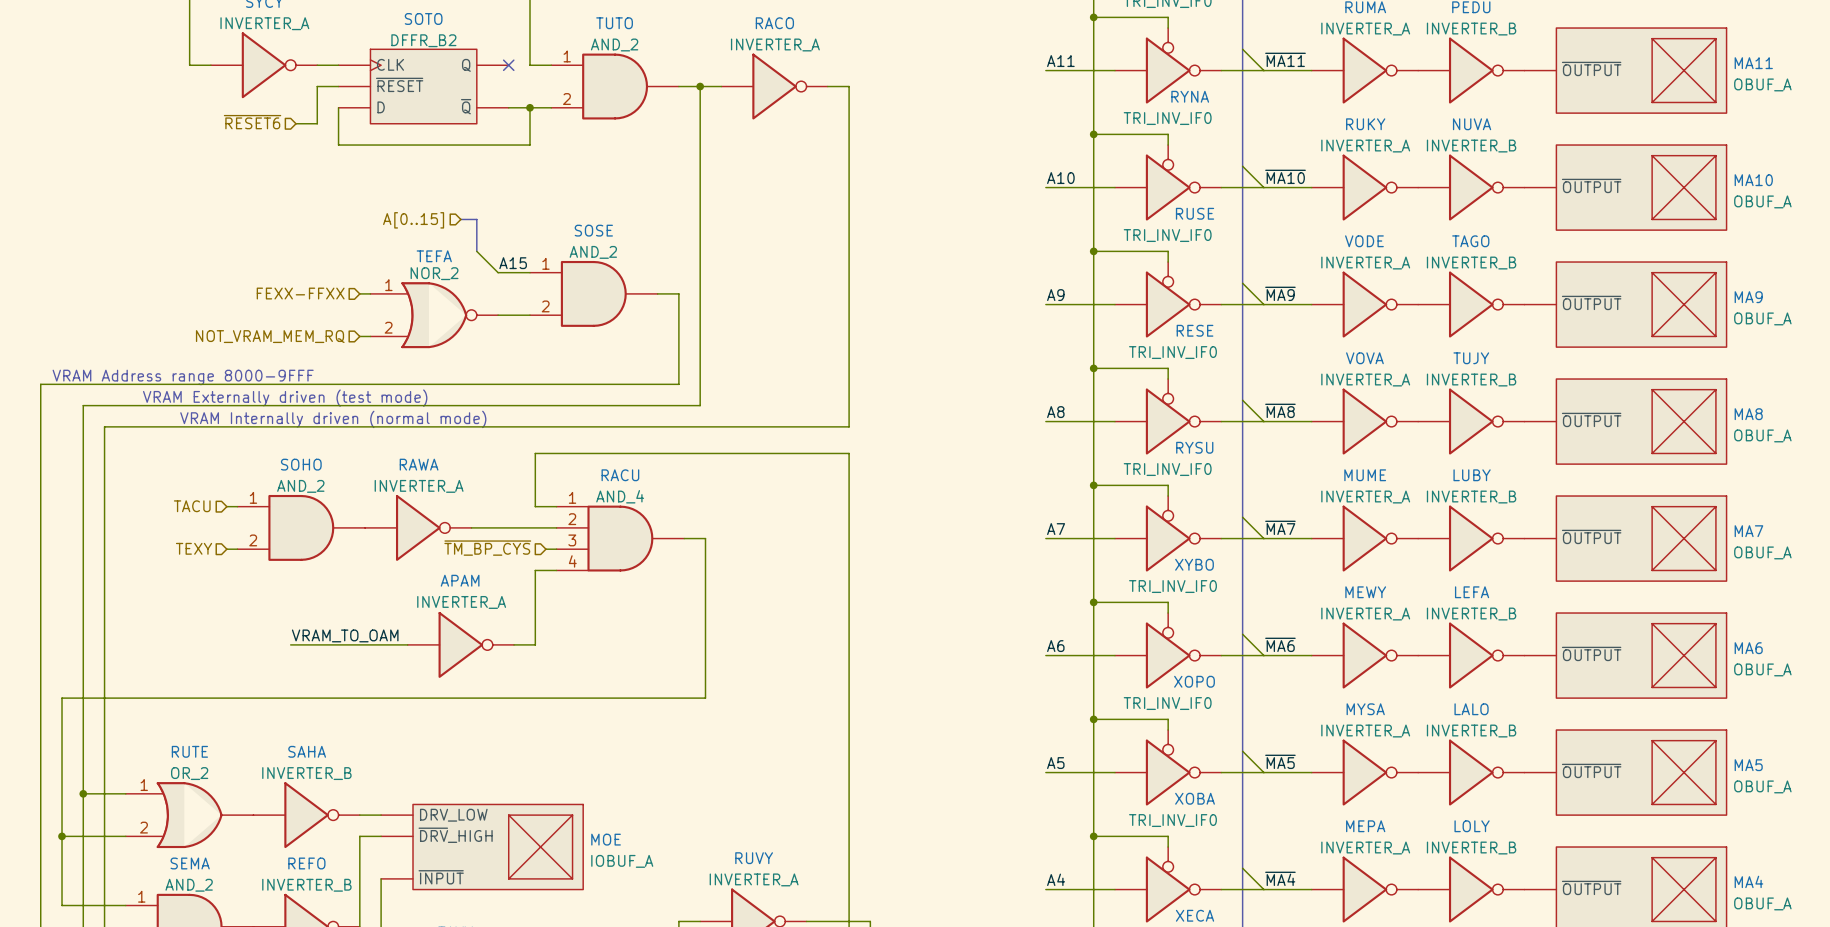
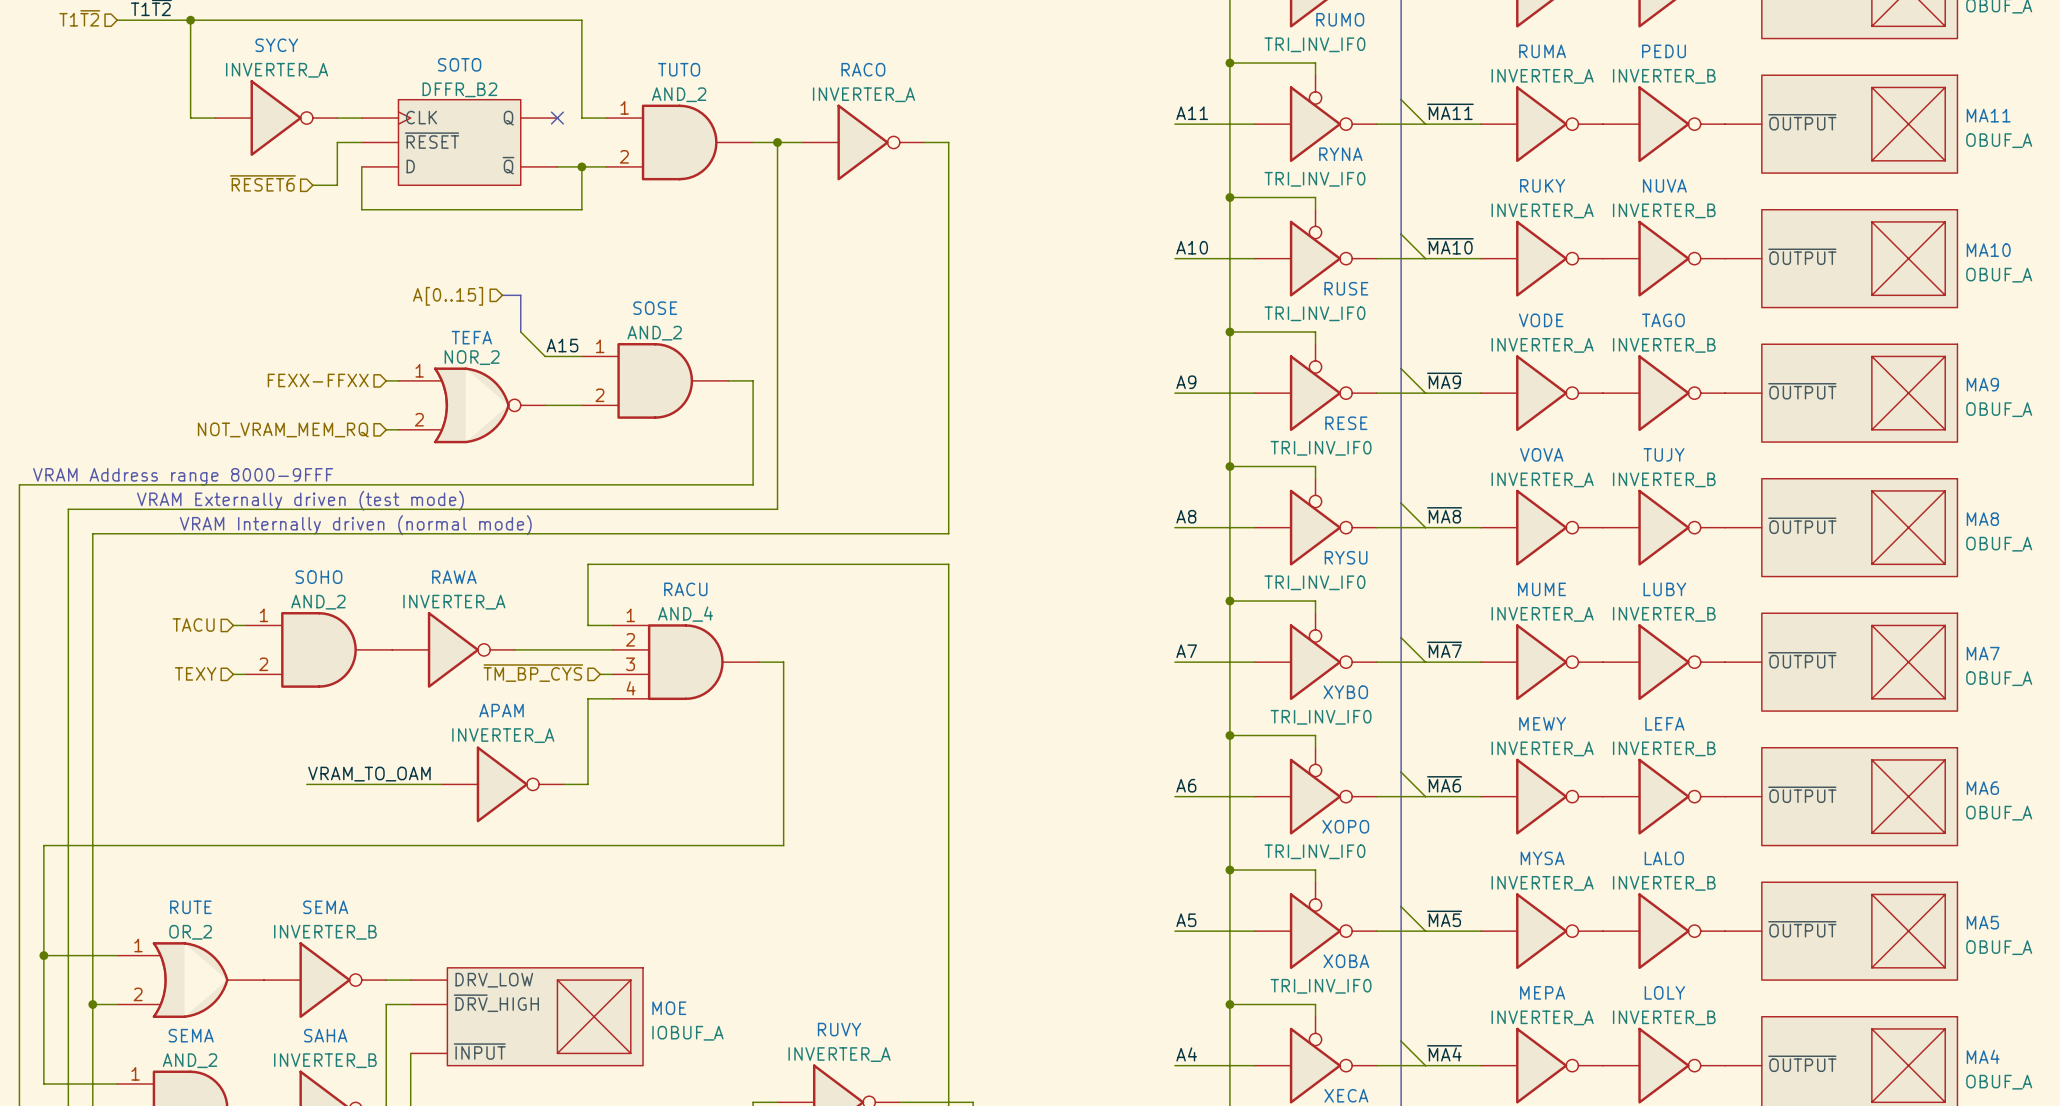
SAHA name: SAHA (307, 751) -> SEMA (325, 907)
wire: none -> (43, 955) (68, 955)
junction: none -> (43, 955)
junction: (83, 793) -> none
wire: (62, 836) (104, 836) -> none
junction: (62, 836) -> none
junction: none -> (92, 1004)
REFO name: REFO (306, 863) -> SAHA (325, 1035)

